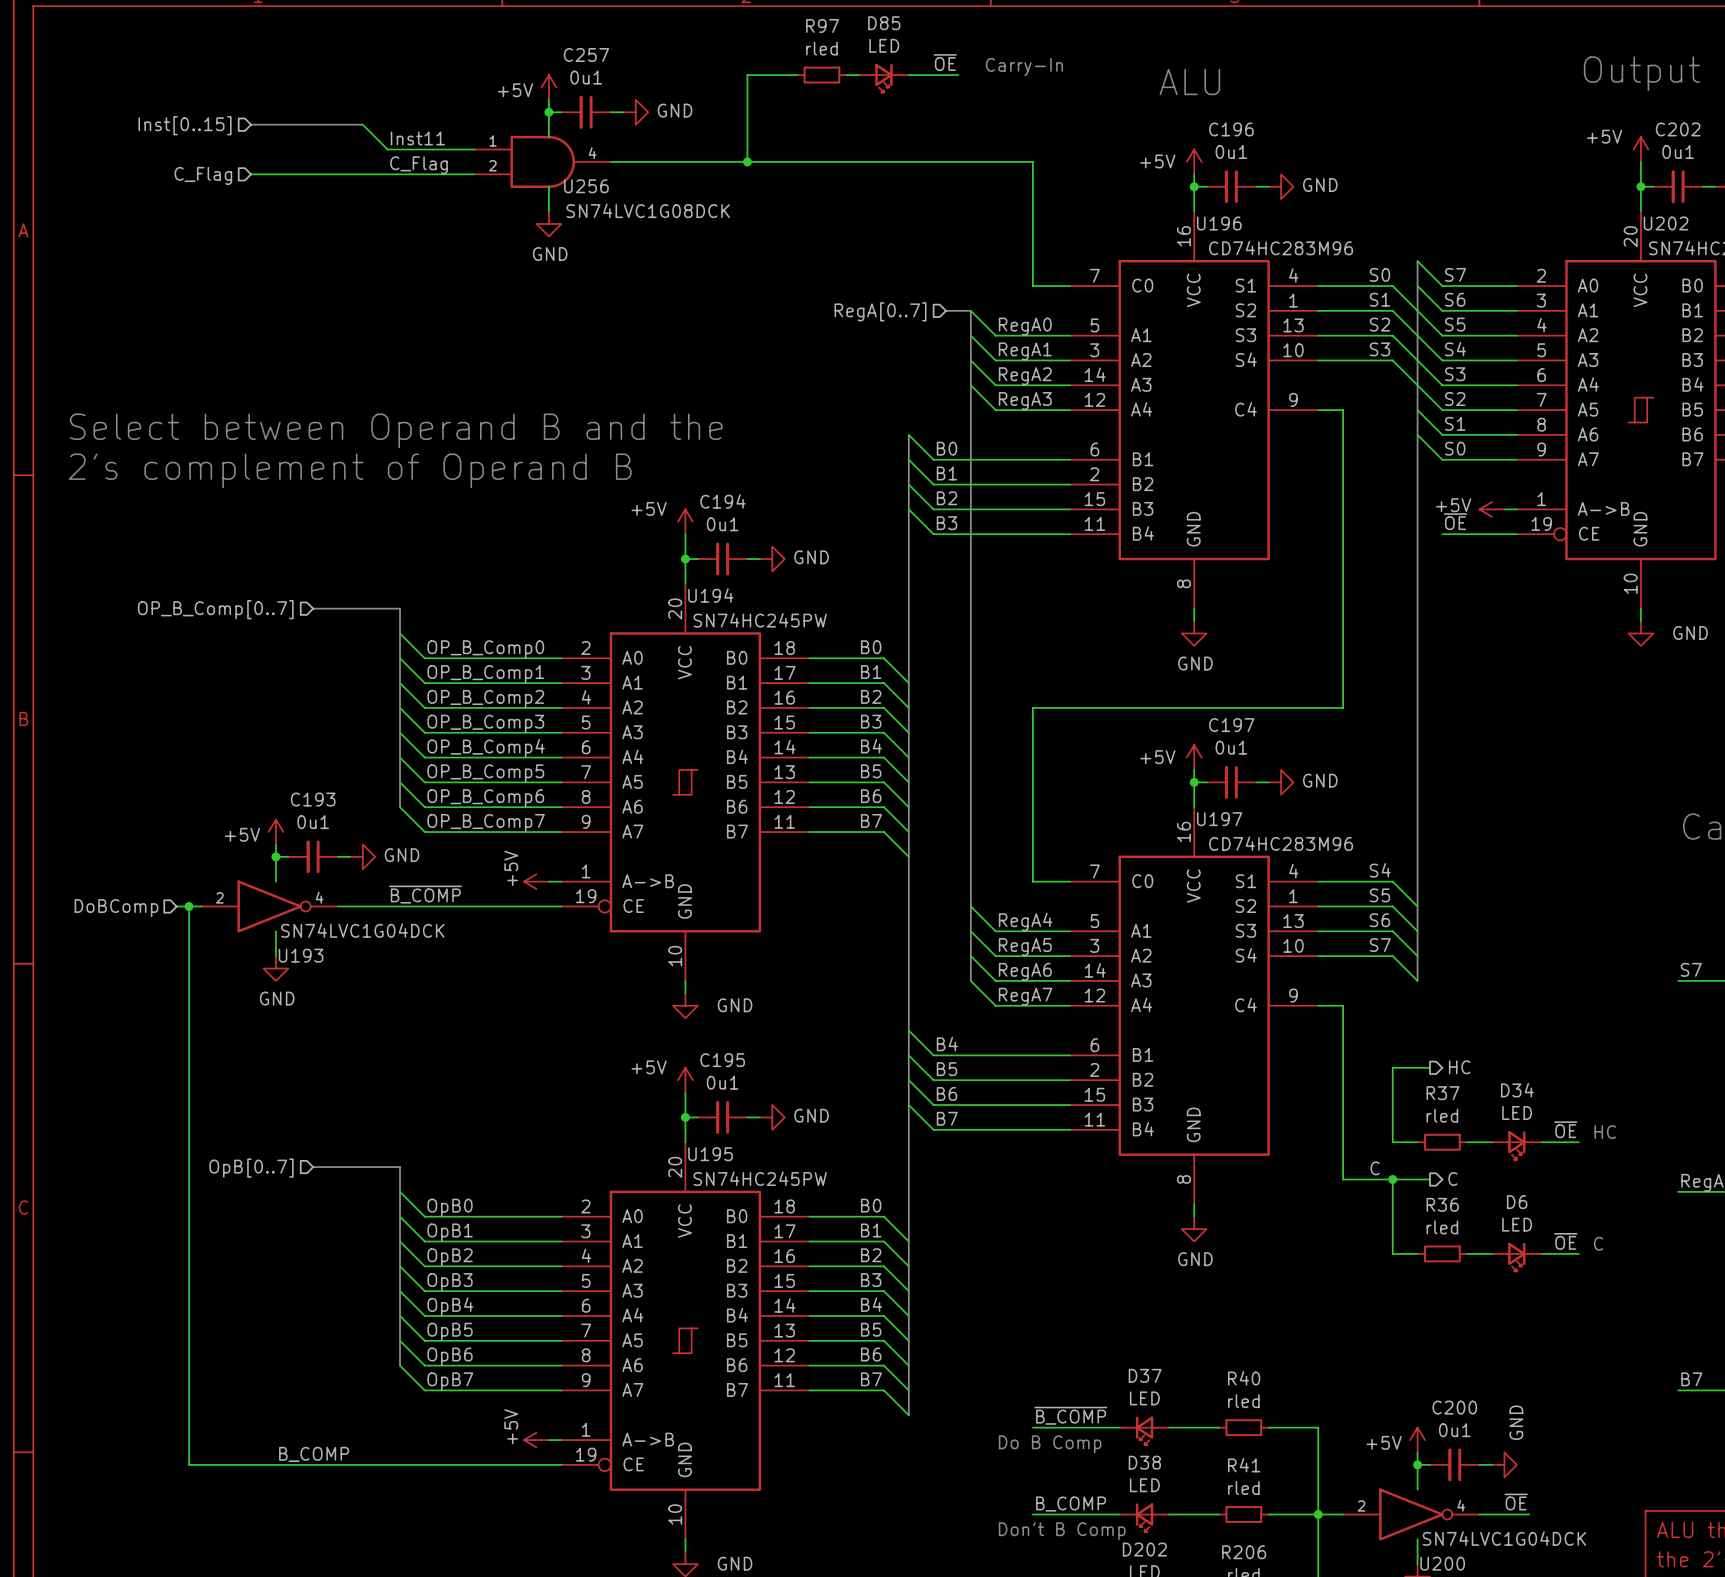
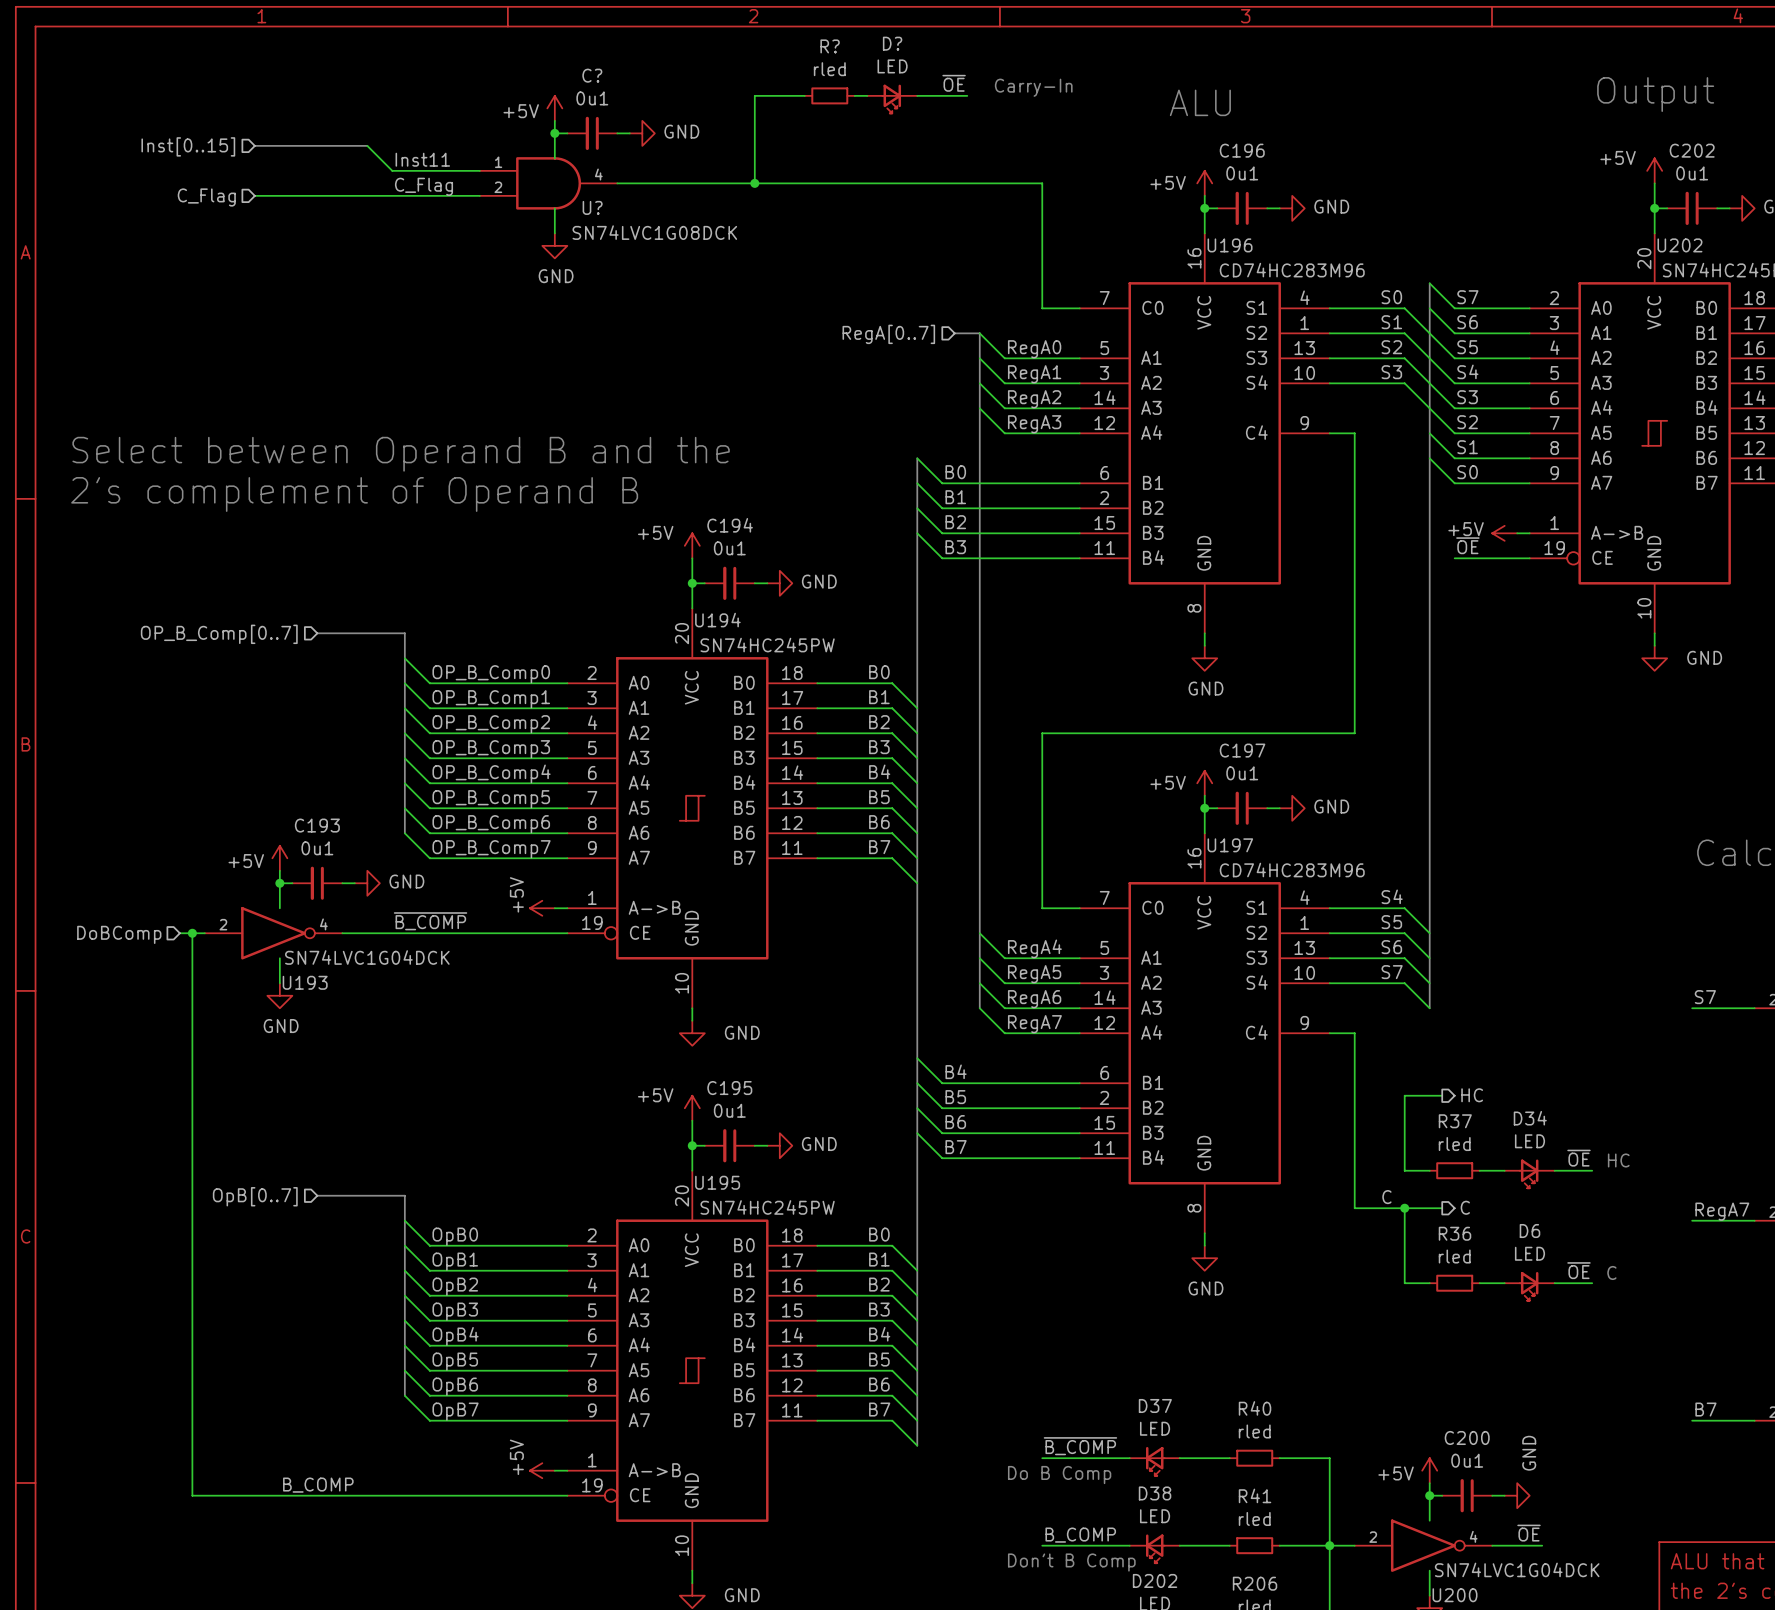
D85 name: D85 (884, 23) -> D? (892, 43)
R97 name: R97 (822, 25) -> R? (830, 46)
C257 name: C257 (586, 54) -> C? (592, 75)
U256 name: U256 (586, 186) -> U? (592, 207)

